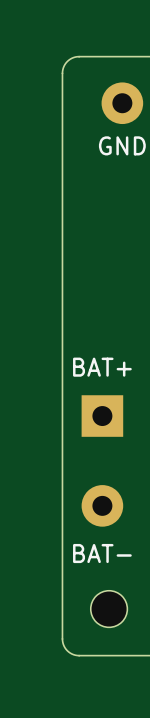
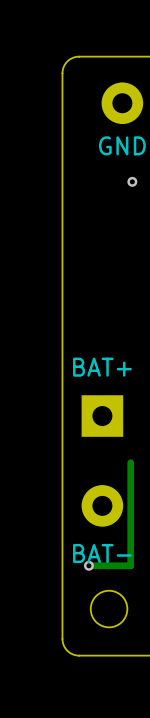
via: none -> (132, 181)
track: none -> (130, 462) (130, 565) (88, 565)
via: none -> (88, 565)

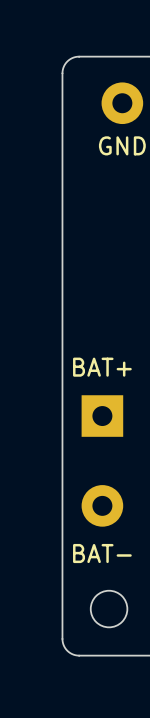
via: (132, 181) -> none
track: (130, 462) (130, 565) (88, 565) -> none
via: (88, 565) -> none

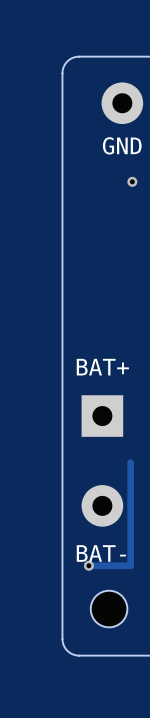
via: none -> (132, 181)
track: none -> (130, 462) (130, 565) (88, 565)
via: none -> (88, 565)

